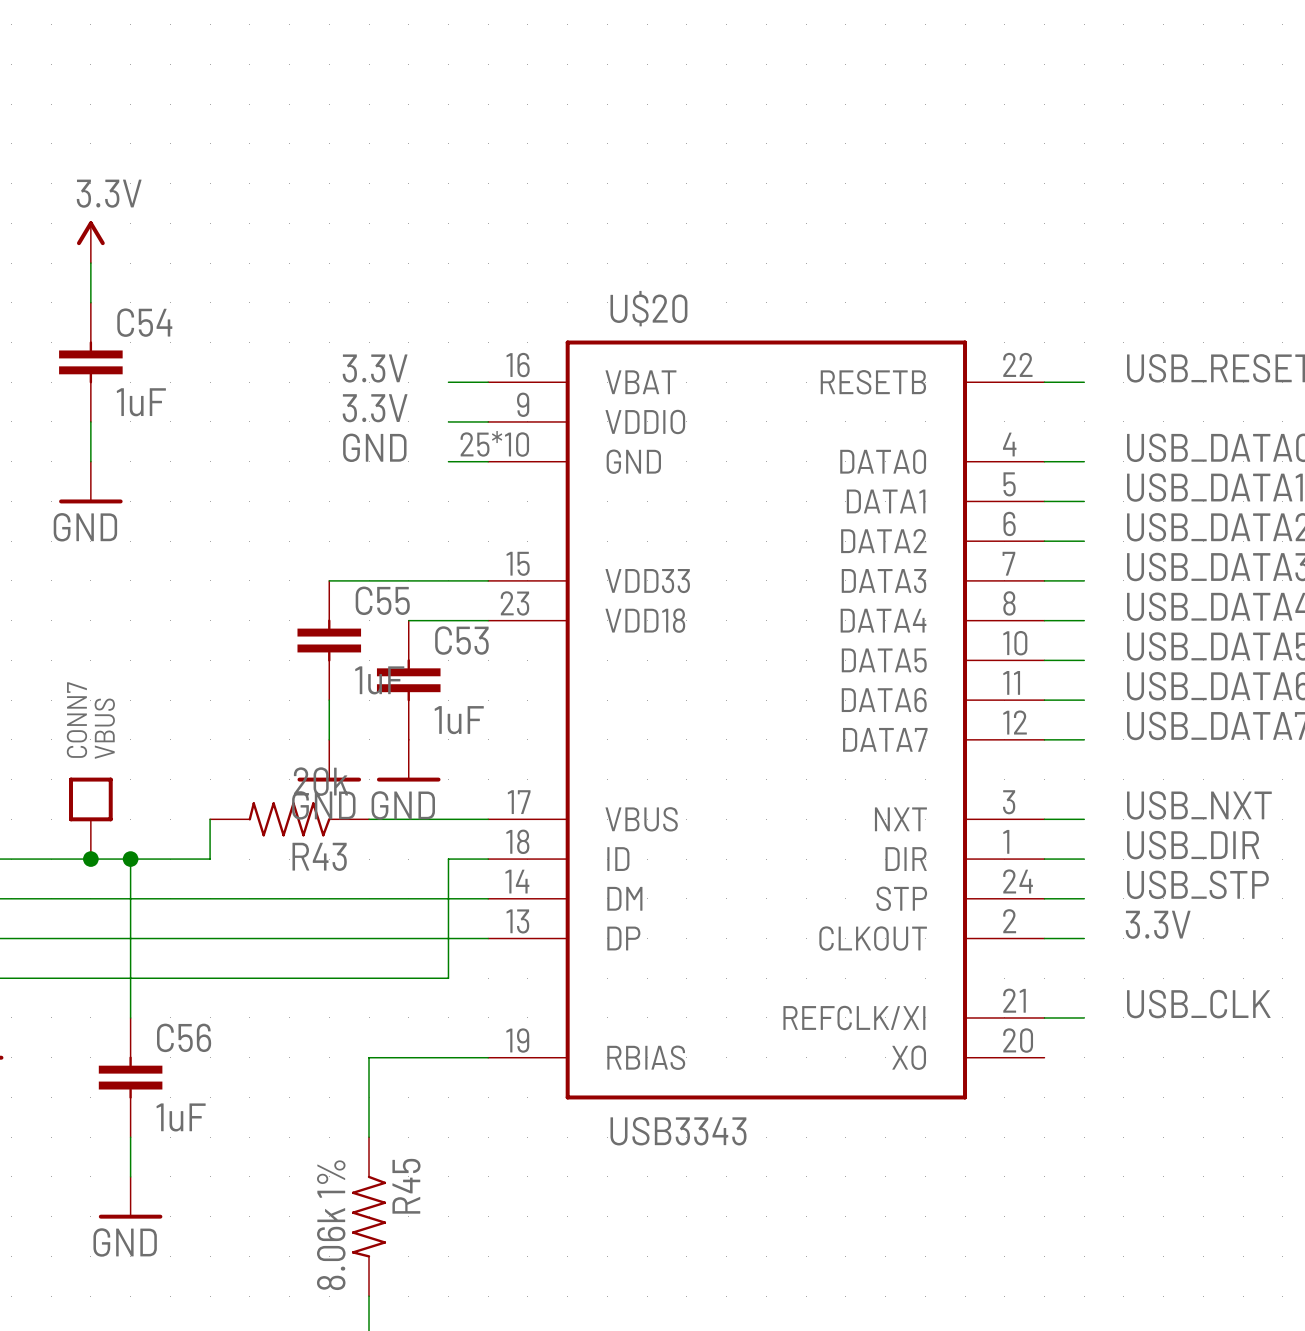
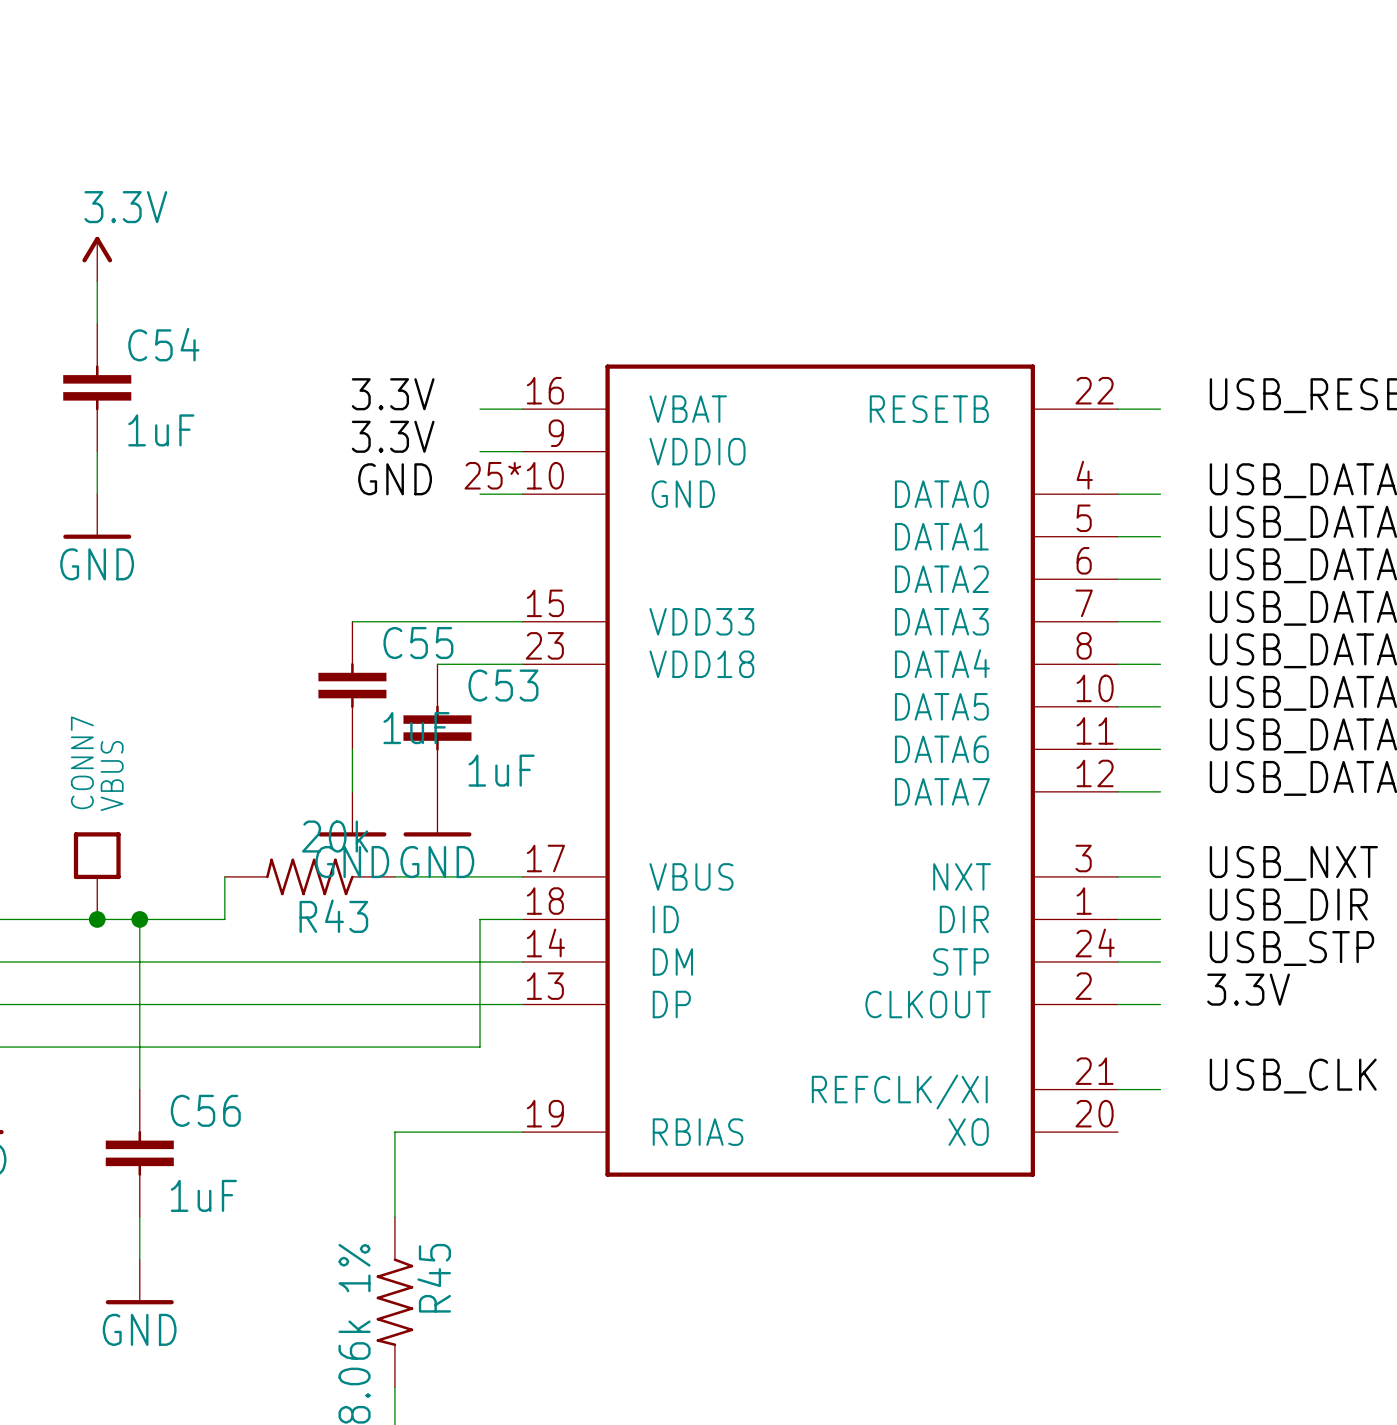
U$20 name: U$20 (648, 308) -> none
U$20 value: USB3343 (678, 1131) -> none

